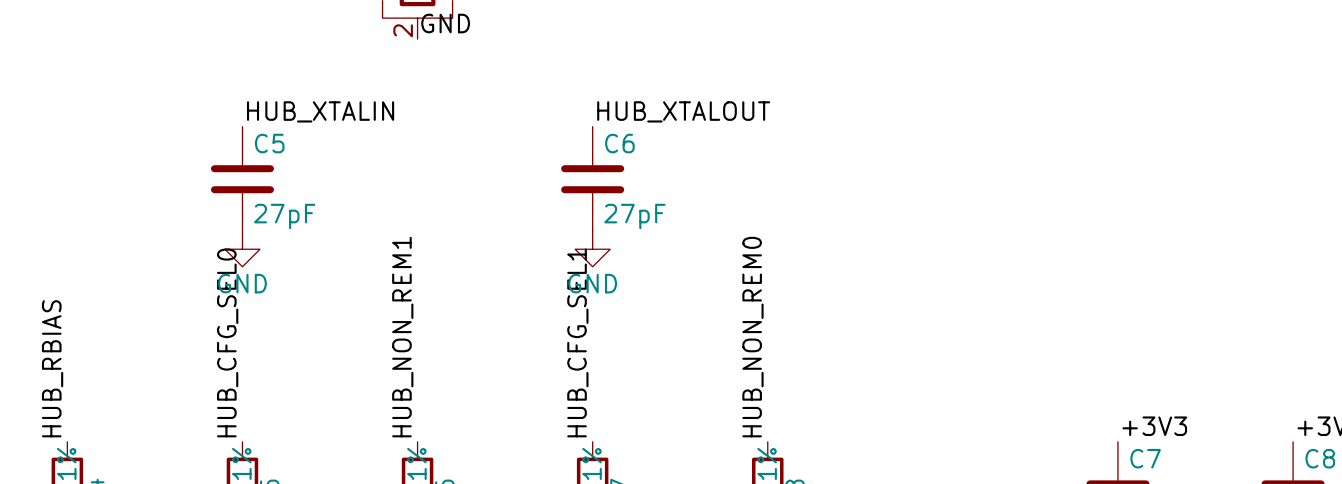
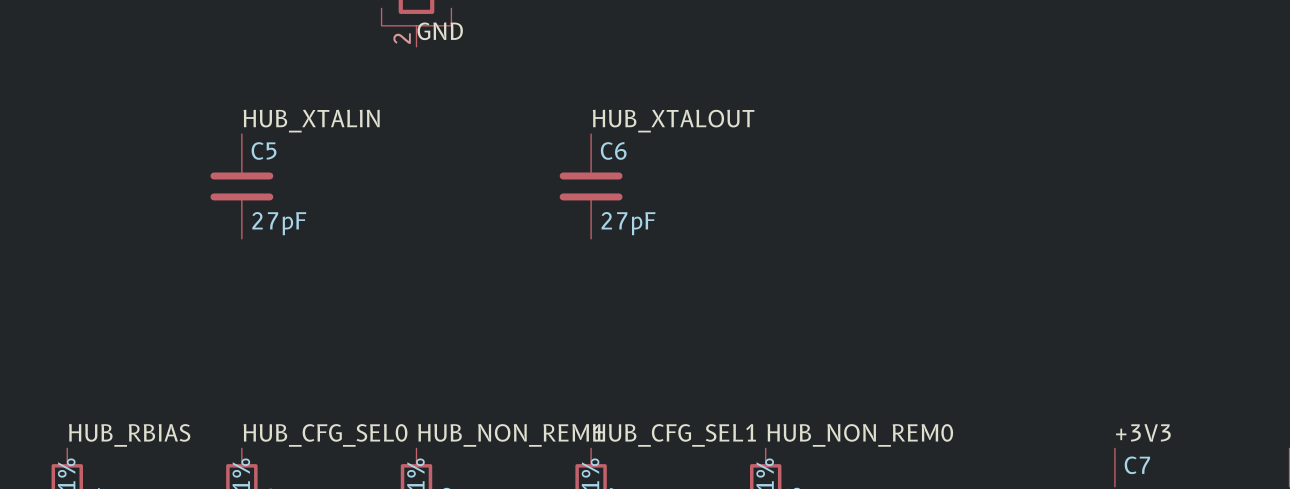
power symbol: GND (242, 249) -> none
power symbol: GND (592, 249) -> none
label rotation: 0° (402, 337) -> 90° clockwise (510, 435)
label rotation: 0° (752, 337) -> 90° clockwise (860, 435)
label rotation: 0° (227, 342) -> 90° clockwise (325, 435)
label rotation: 0° (577, 342) -> 90° clockwise (674, 435)
label rotation: 0° (52, 368) -> 90° clockwise (129, 435)

